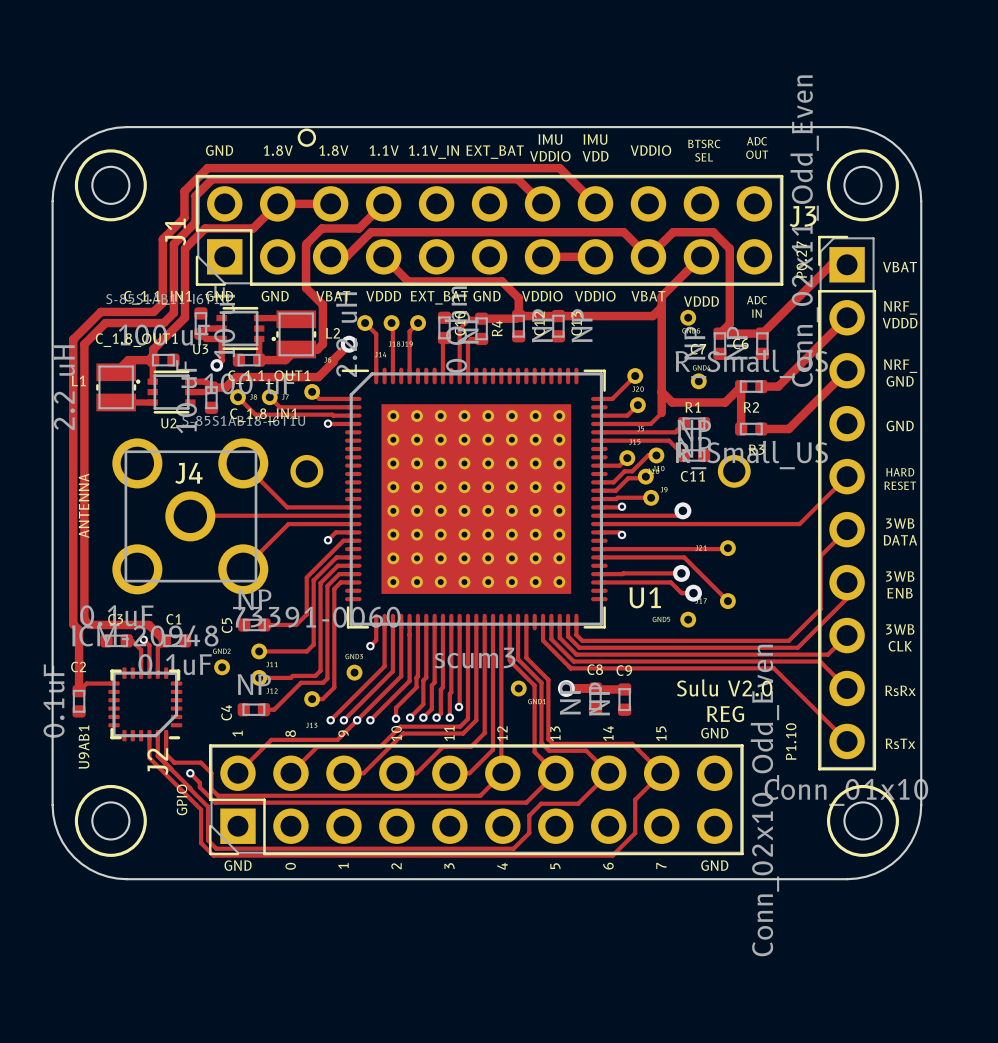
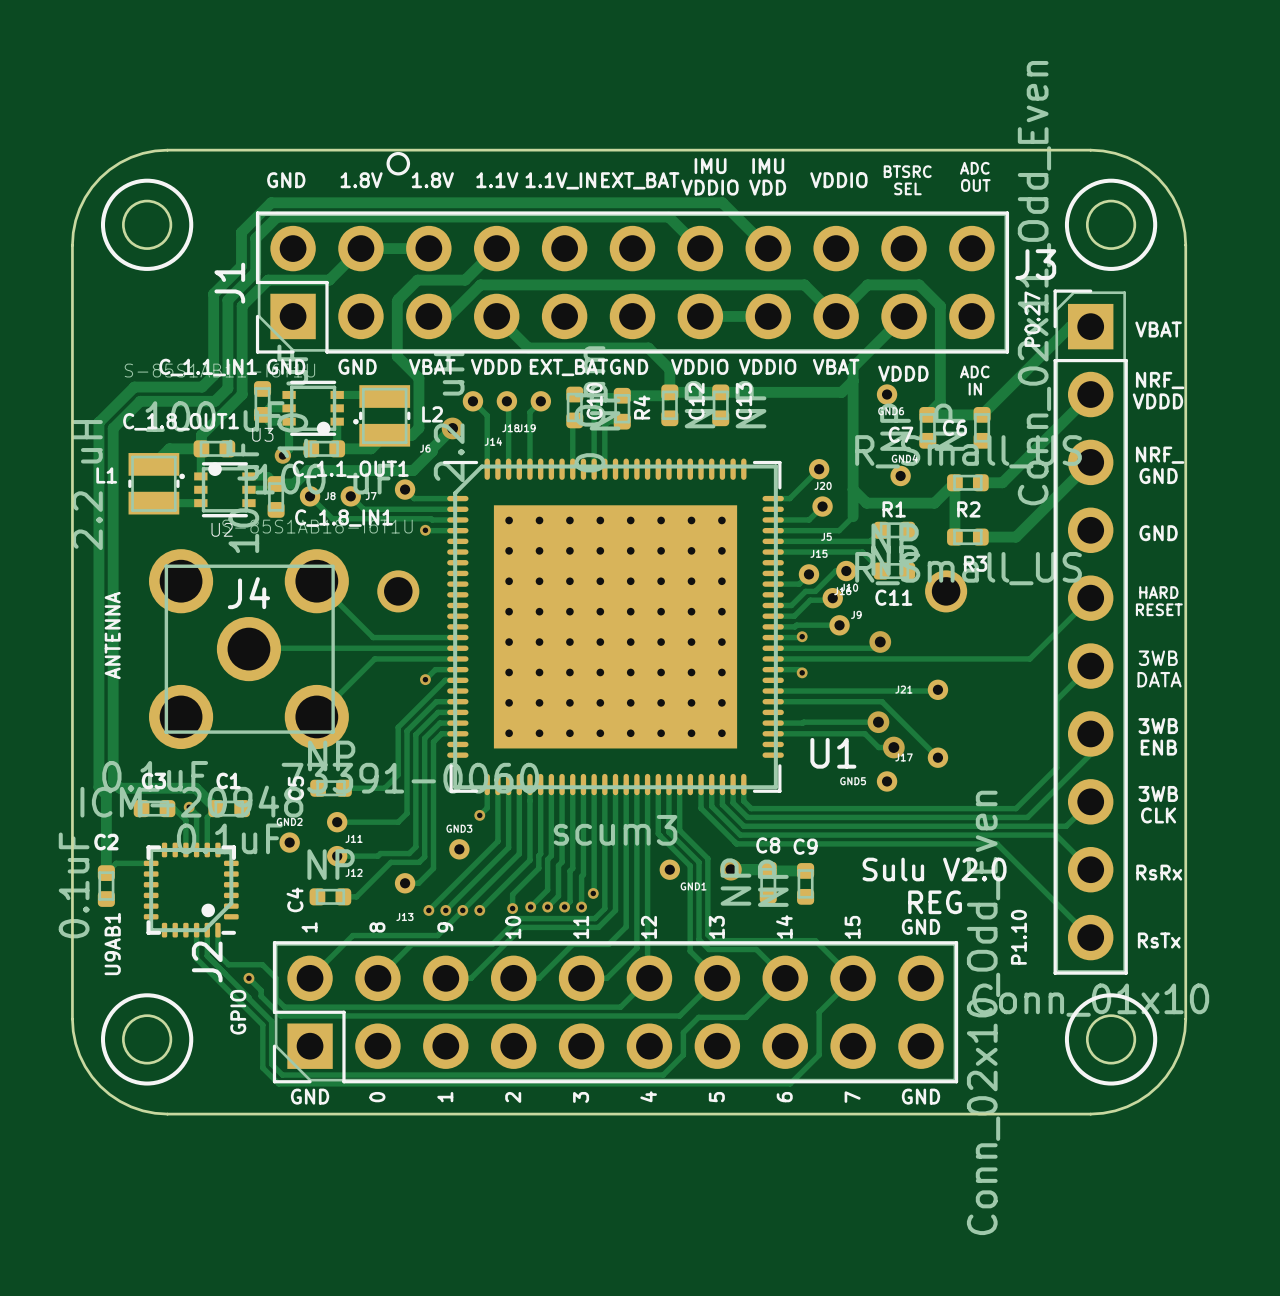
drawing: none -> [316, 421, 331, 436]
drawing: none -> [208, 462, 222, 476]
drawing: none -> [201, 903, 216, 918]

